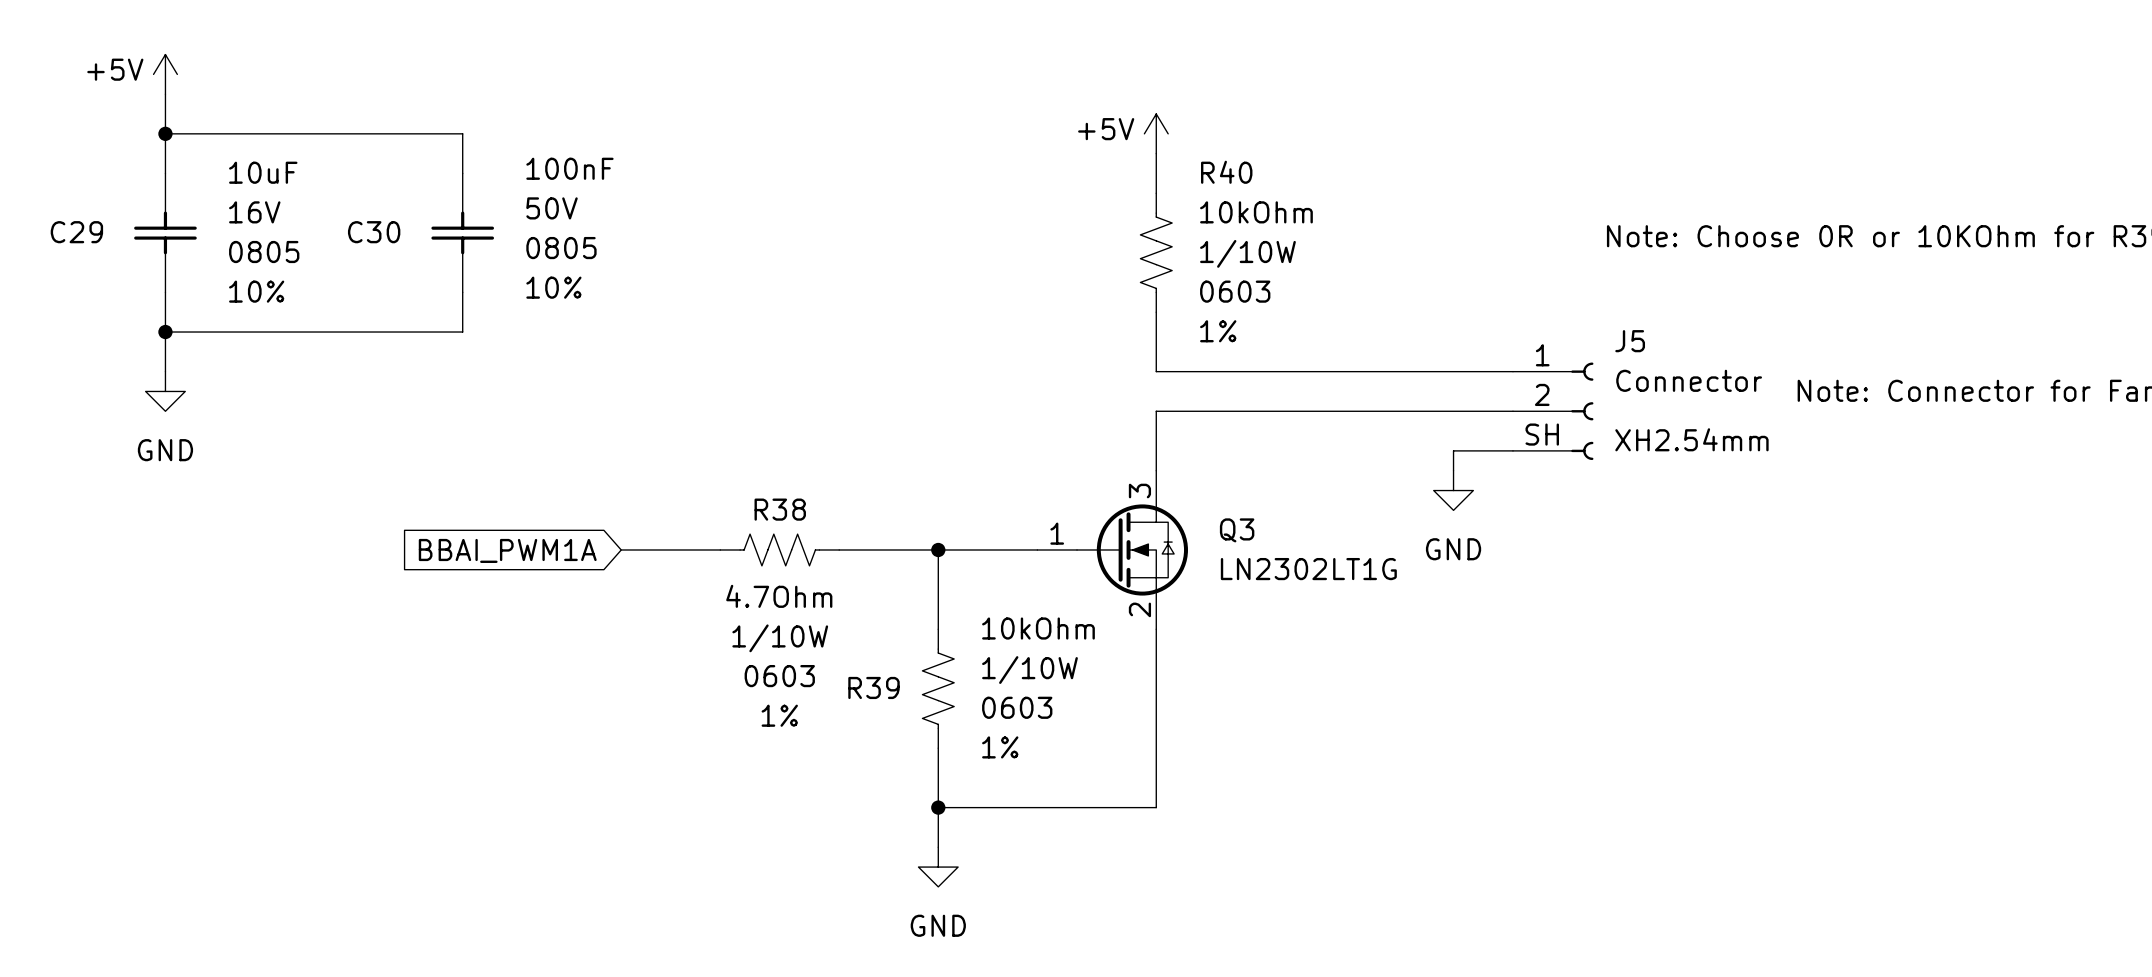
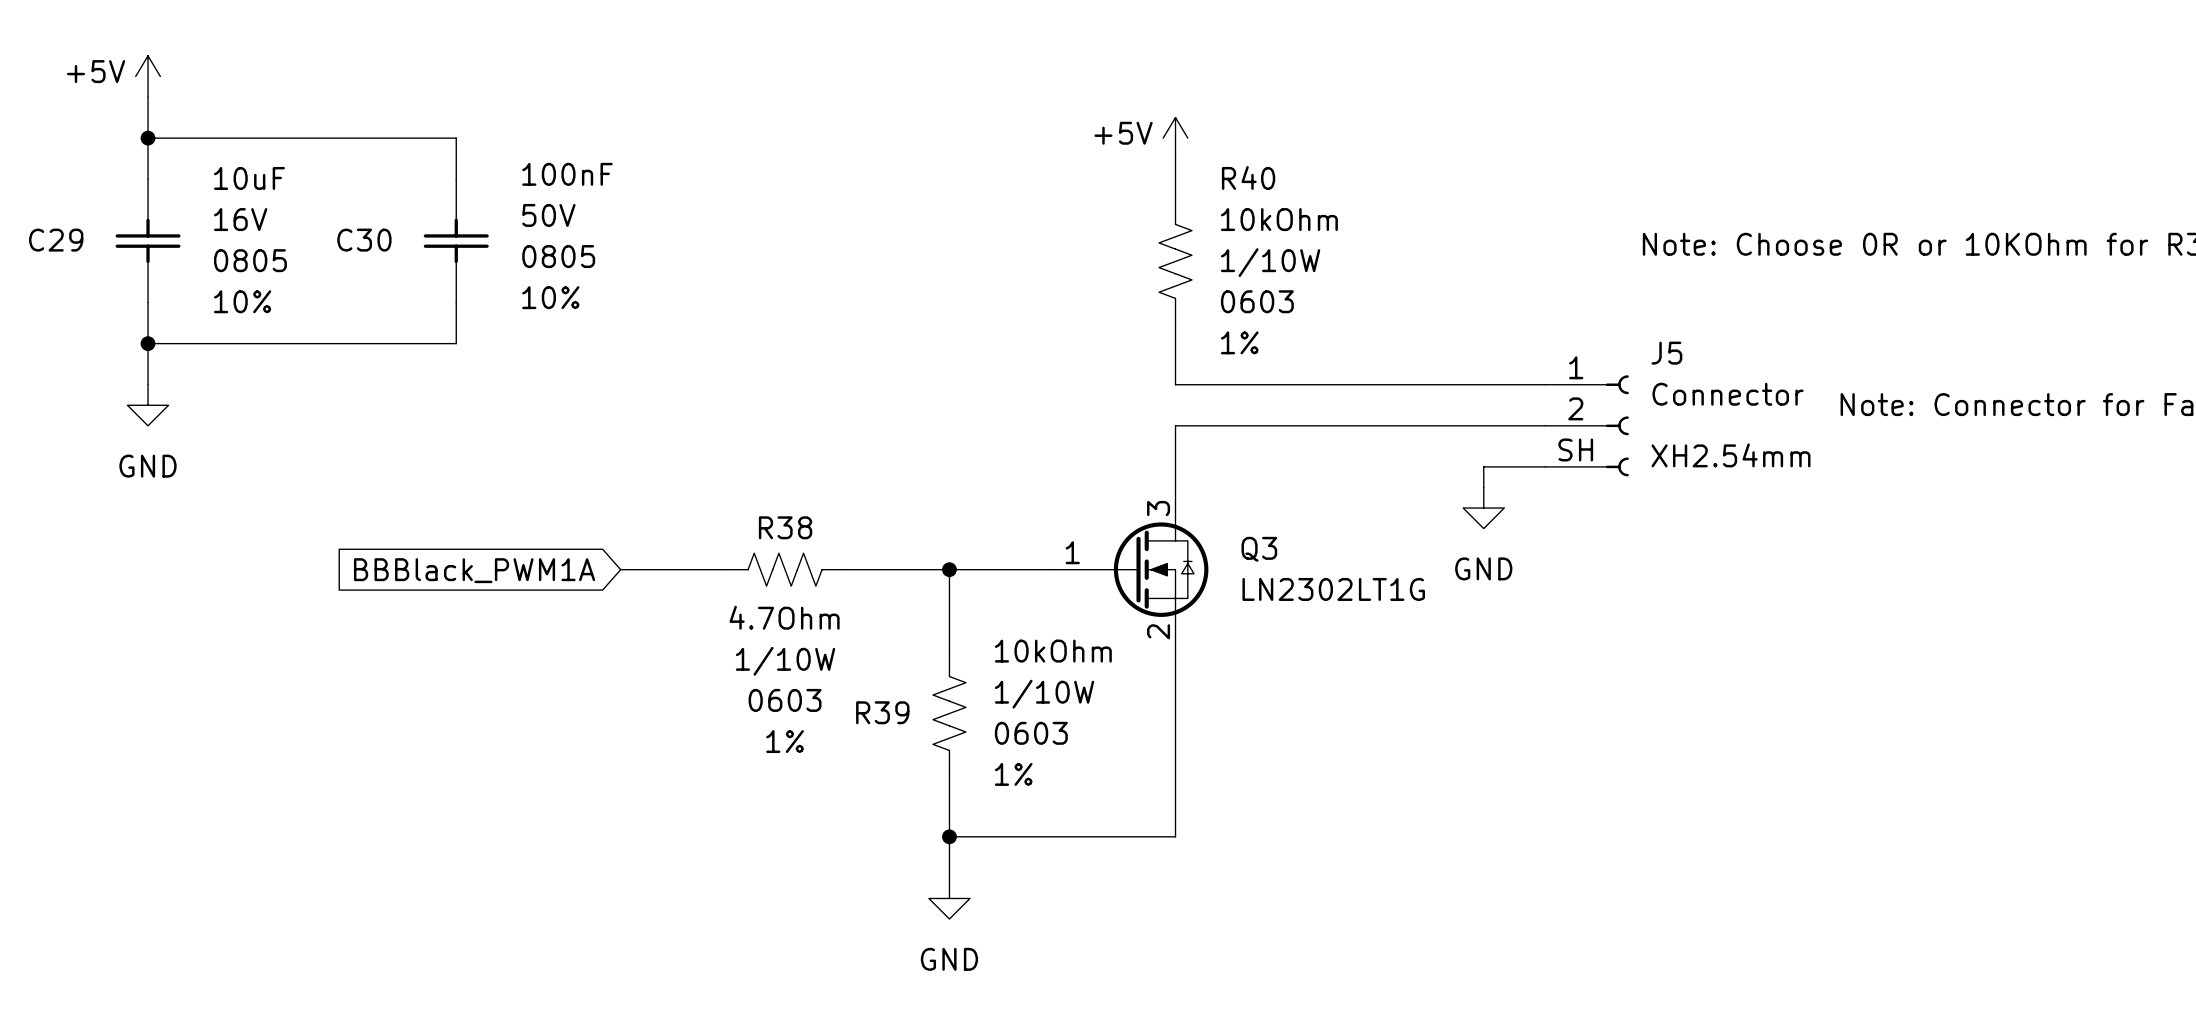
global label: BBAI_PWM1A (507, 550) -> BBBlack_PWM1A (474, 570)

